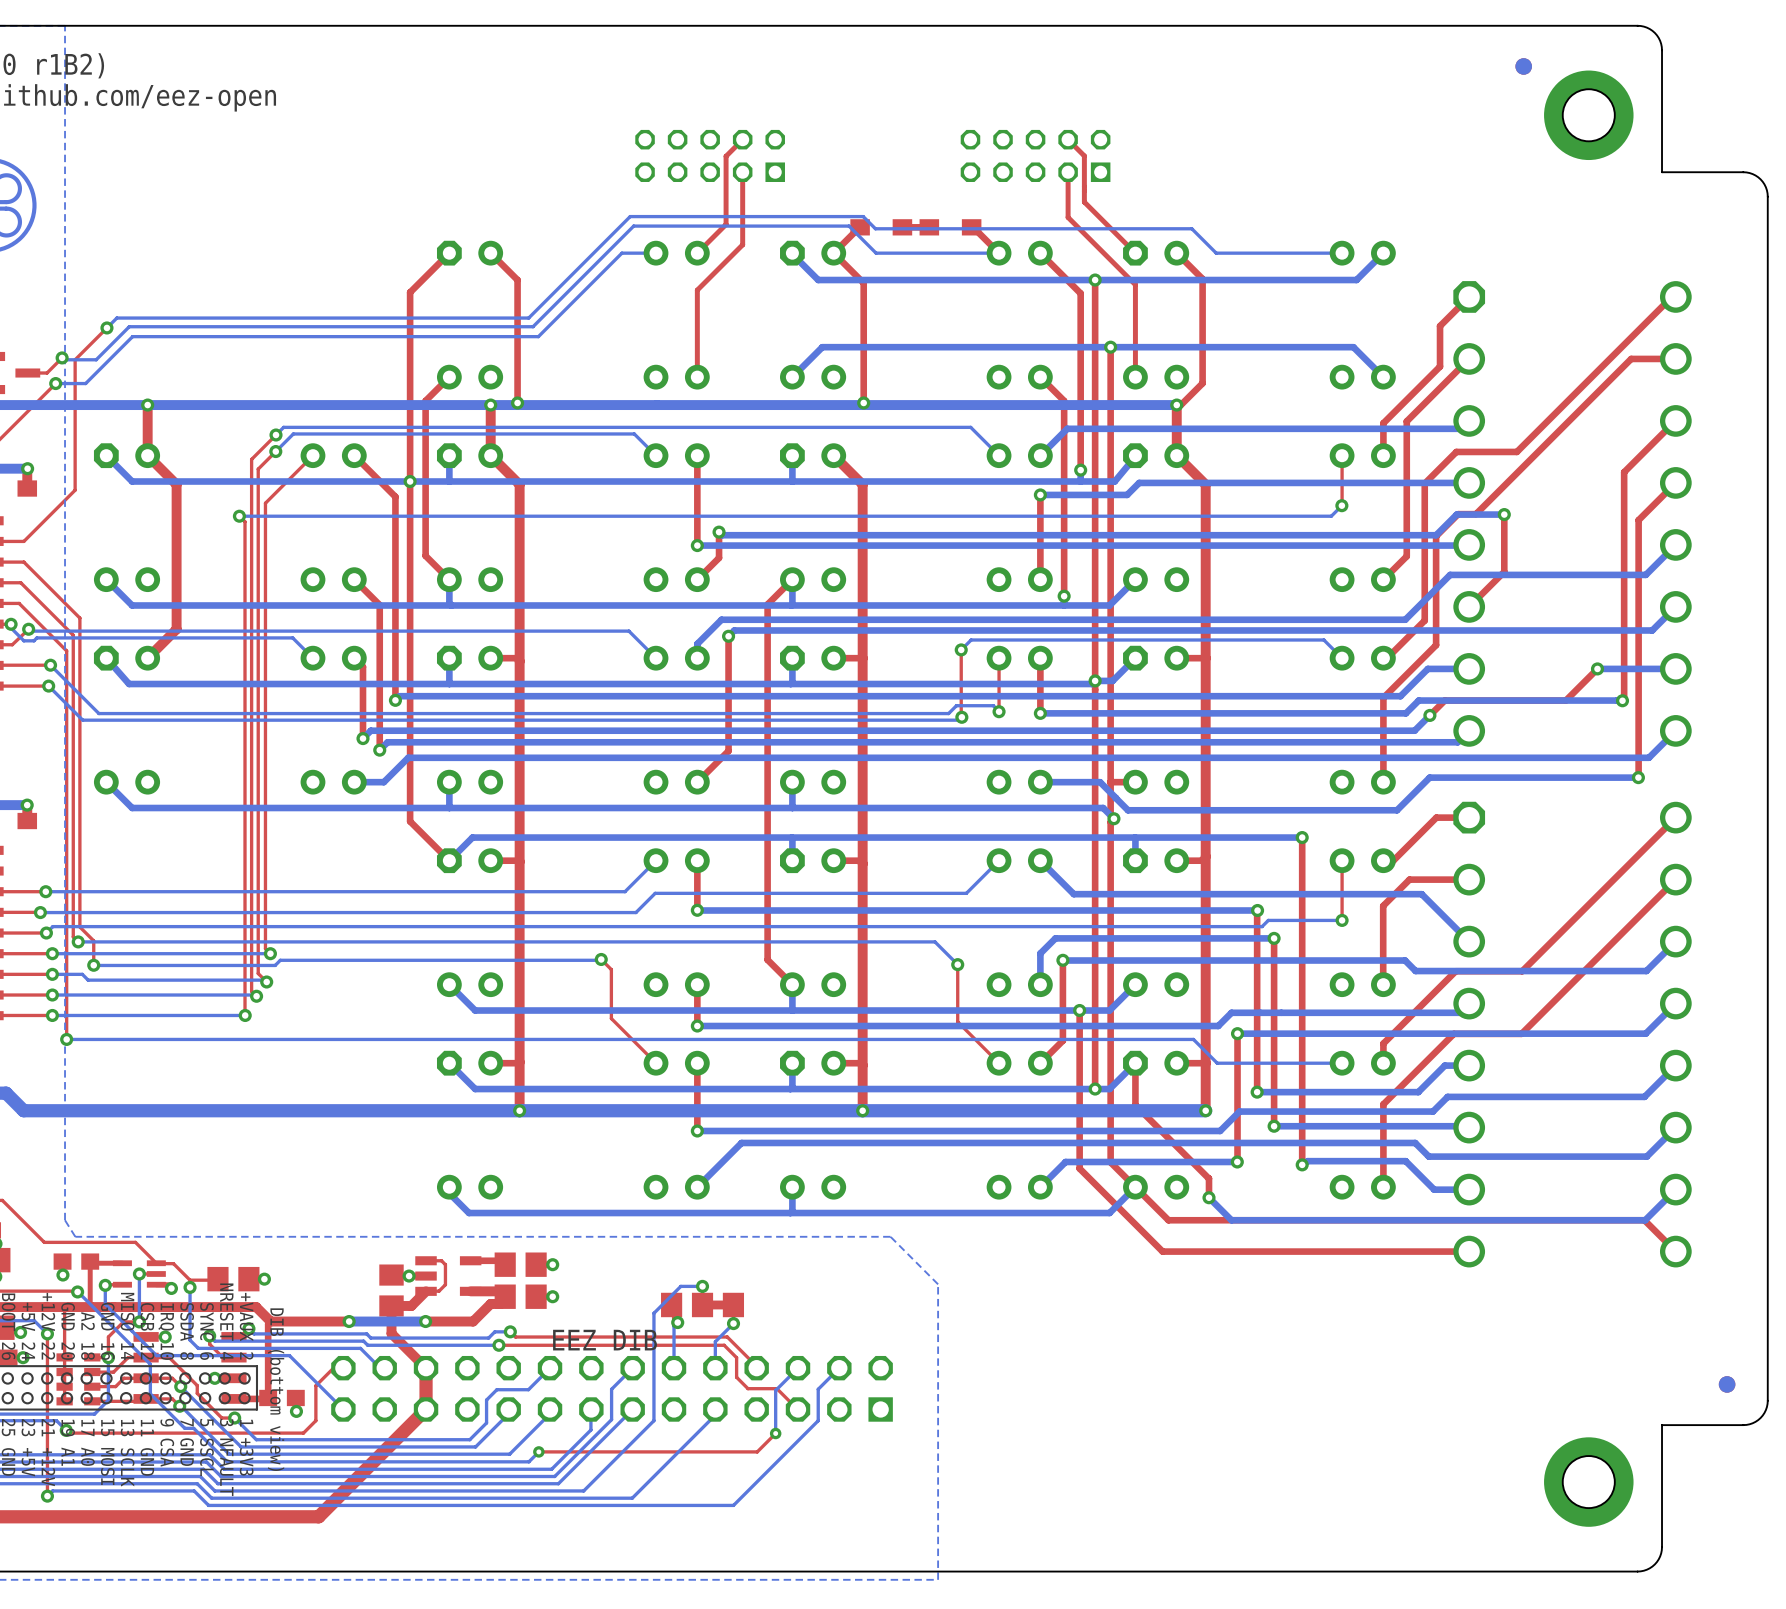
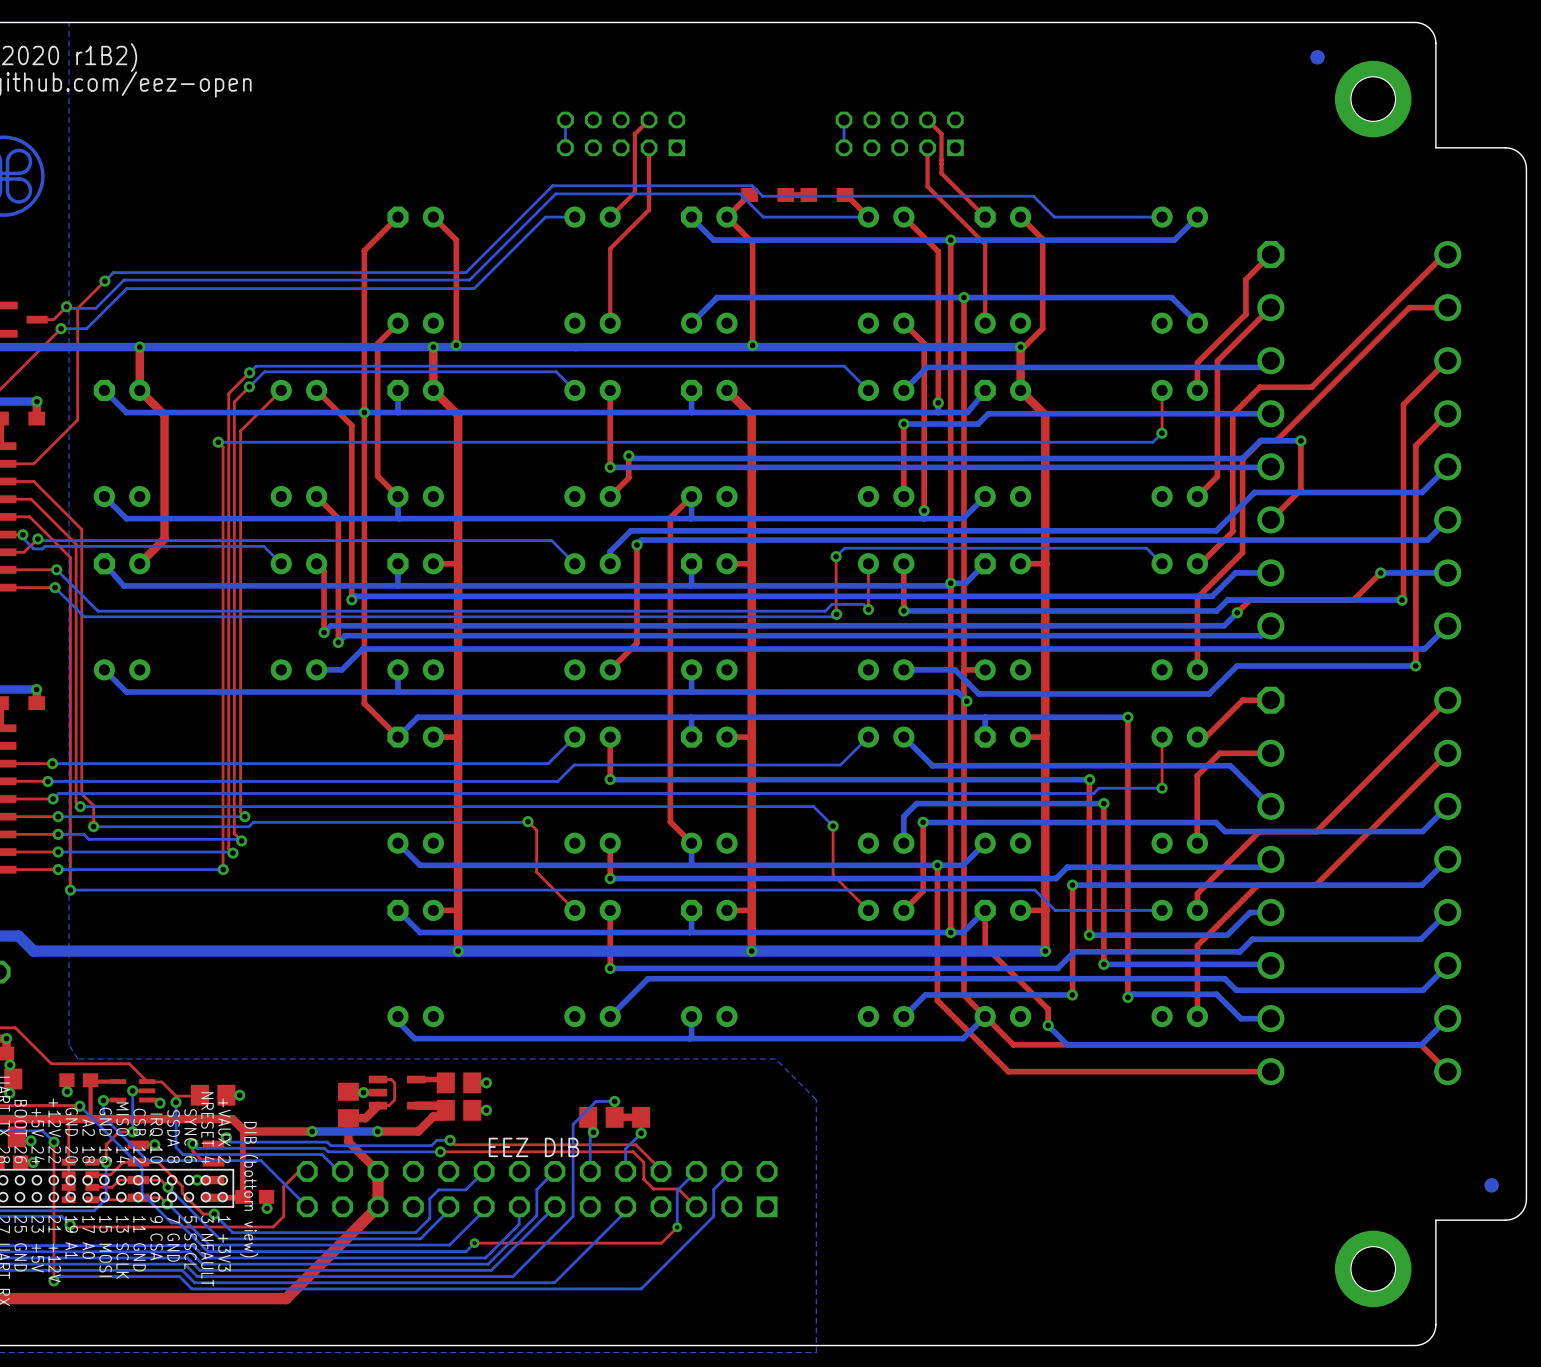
bottom track: none -> (565, 119) (565, 147)
bottom track: none -> (844, 119) (844, 147)

